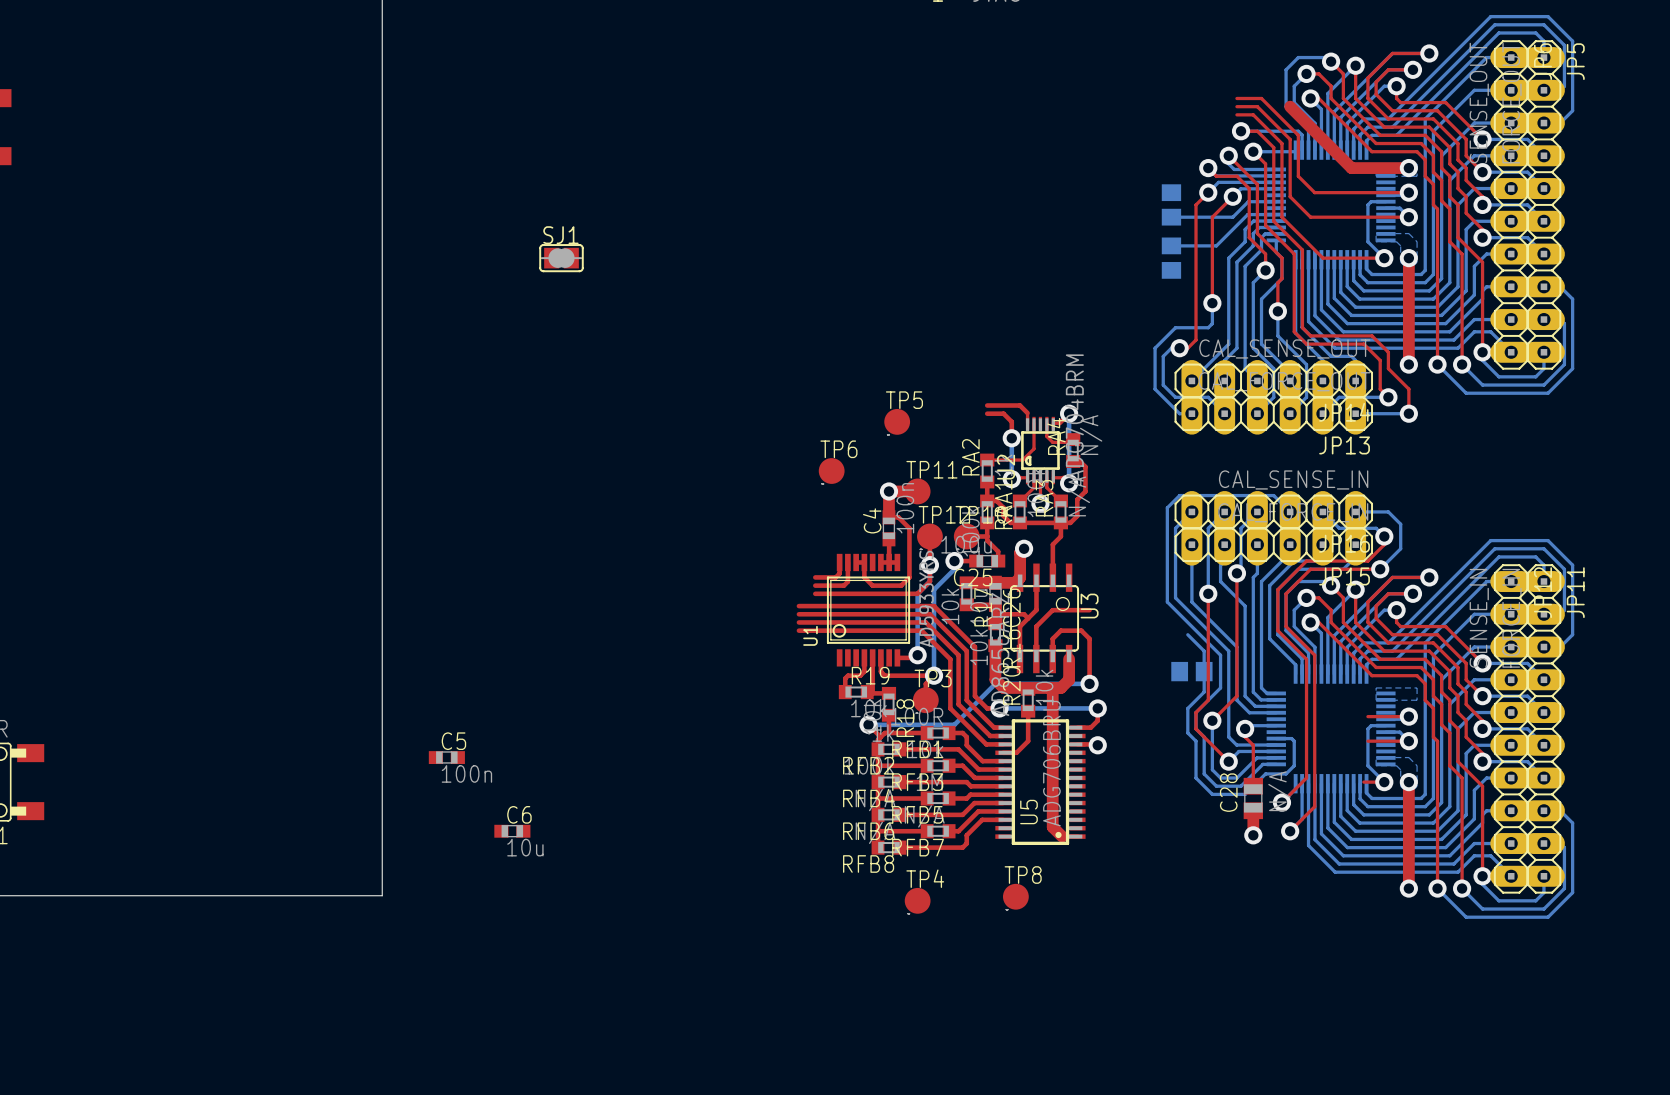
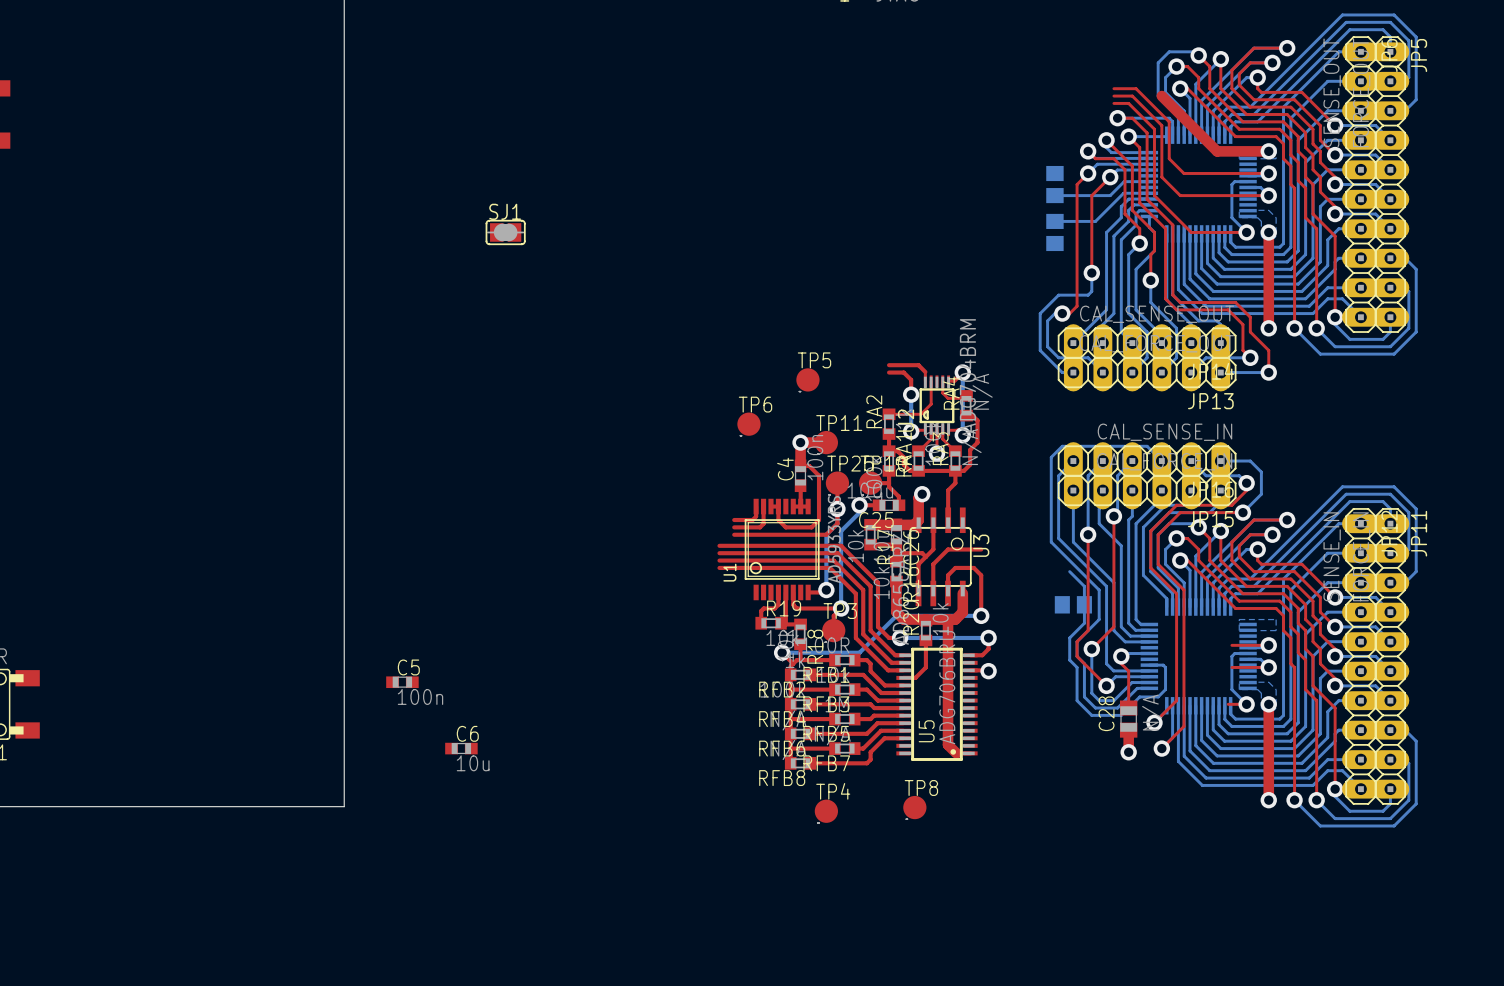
TP12 name: TP12 (944, 514) -> TP25 (850, 463)

